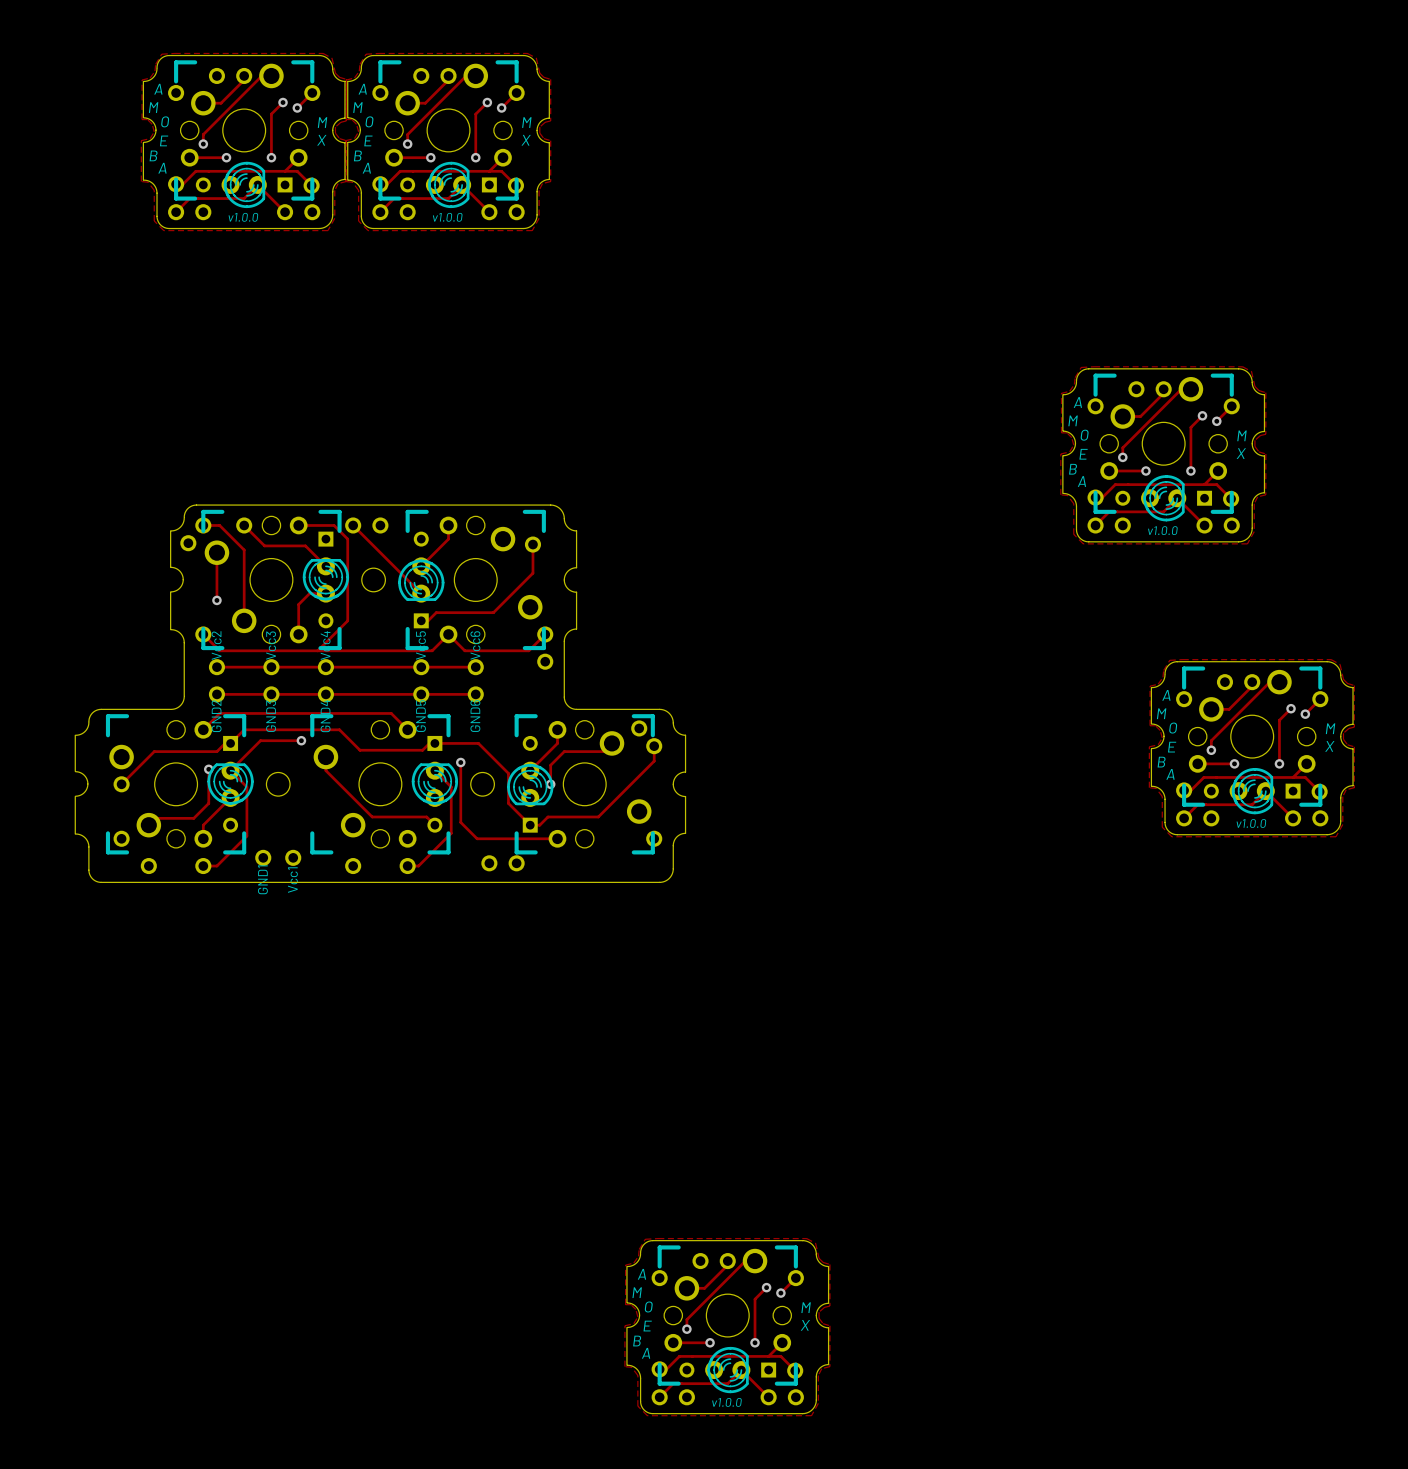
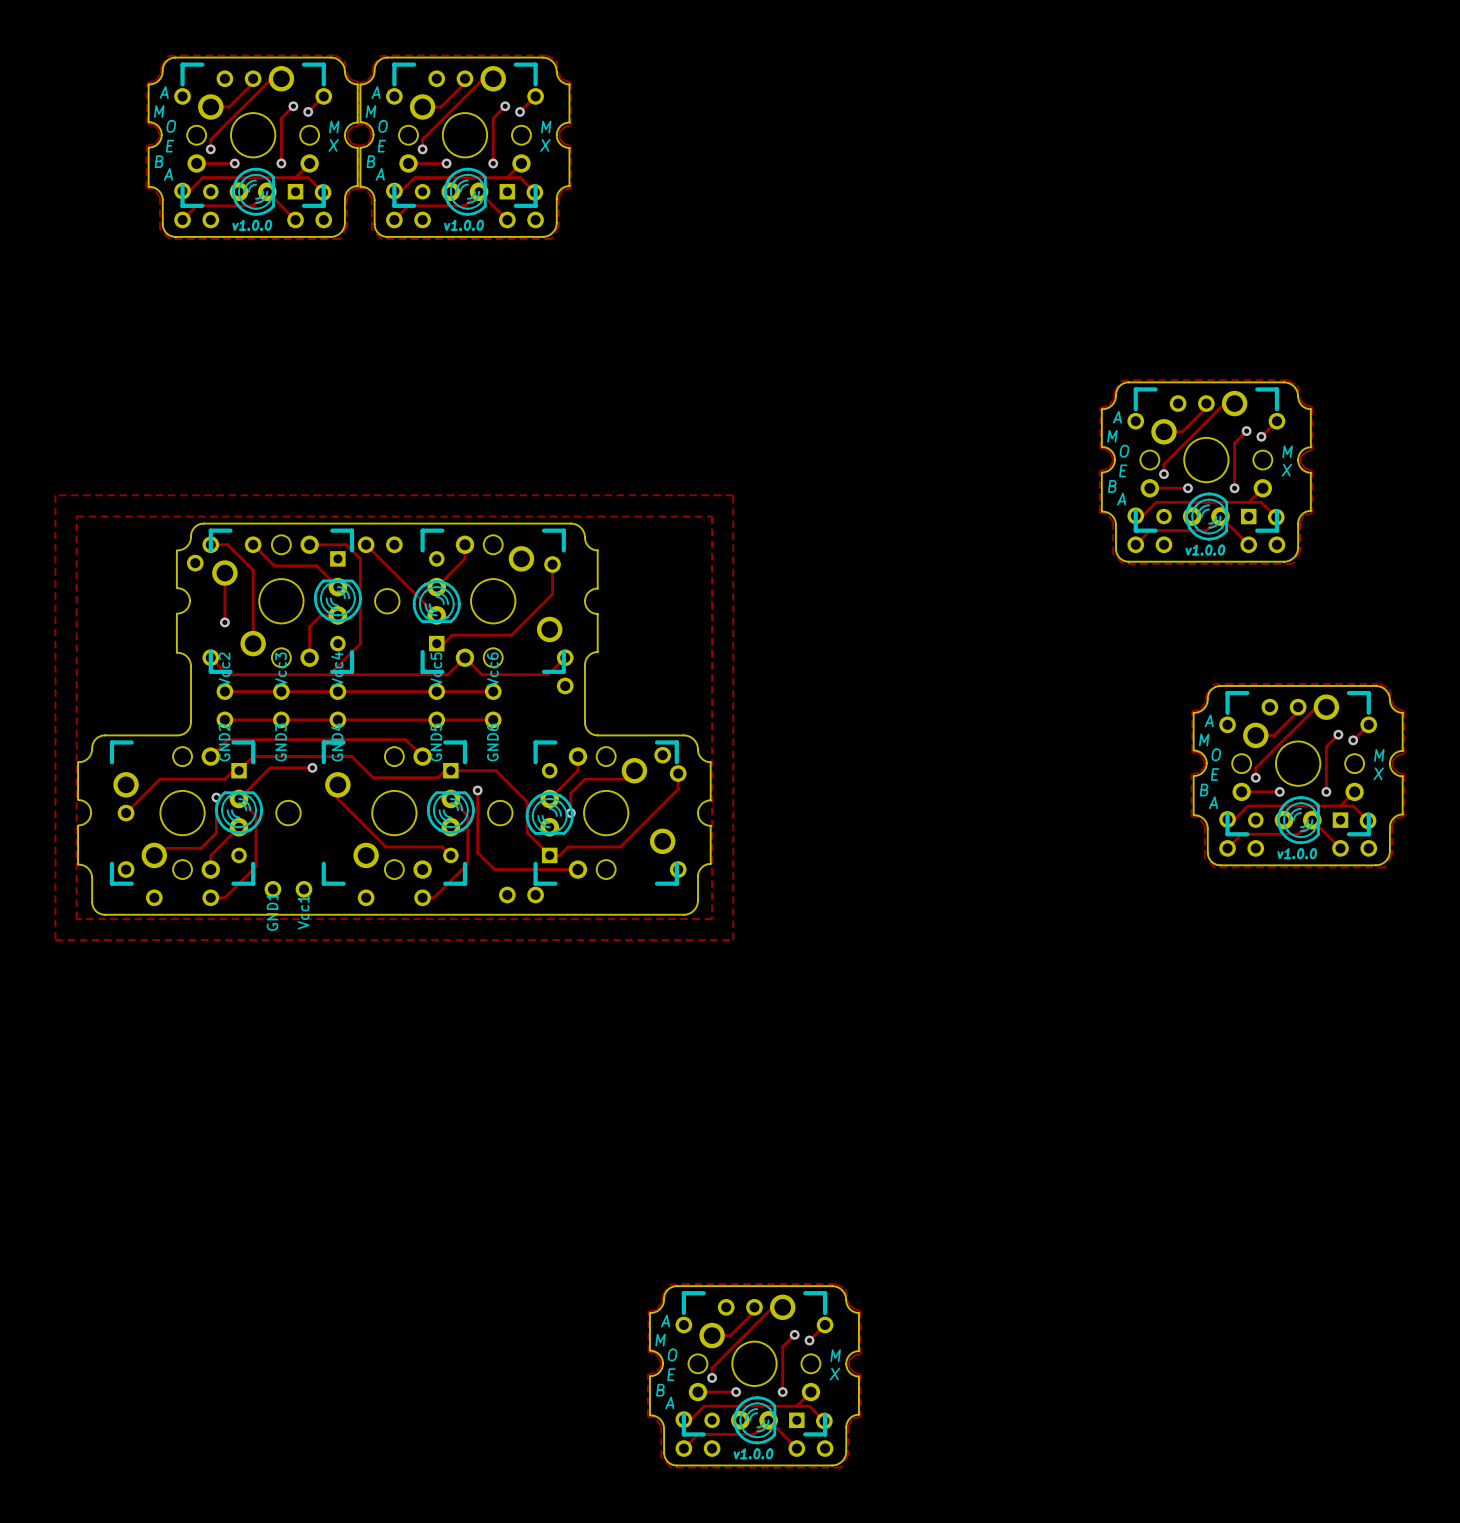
zone outline: none -> (55, 495) (733, 495) (733, 940) (55, 940) (55, 495)
zone outline: none -> (76, 516) (76, 918) (712, 918) (712, 516) (76, 516)

